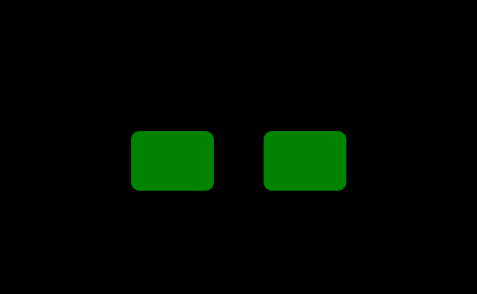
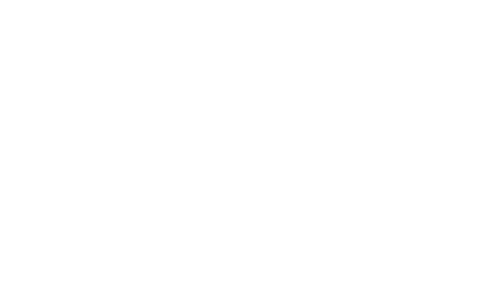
part: (238, 160) -> none

